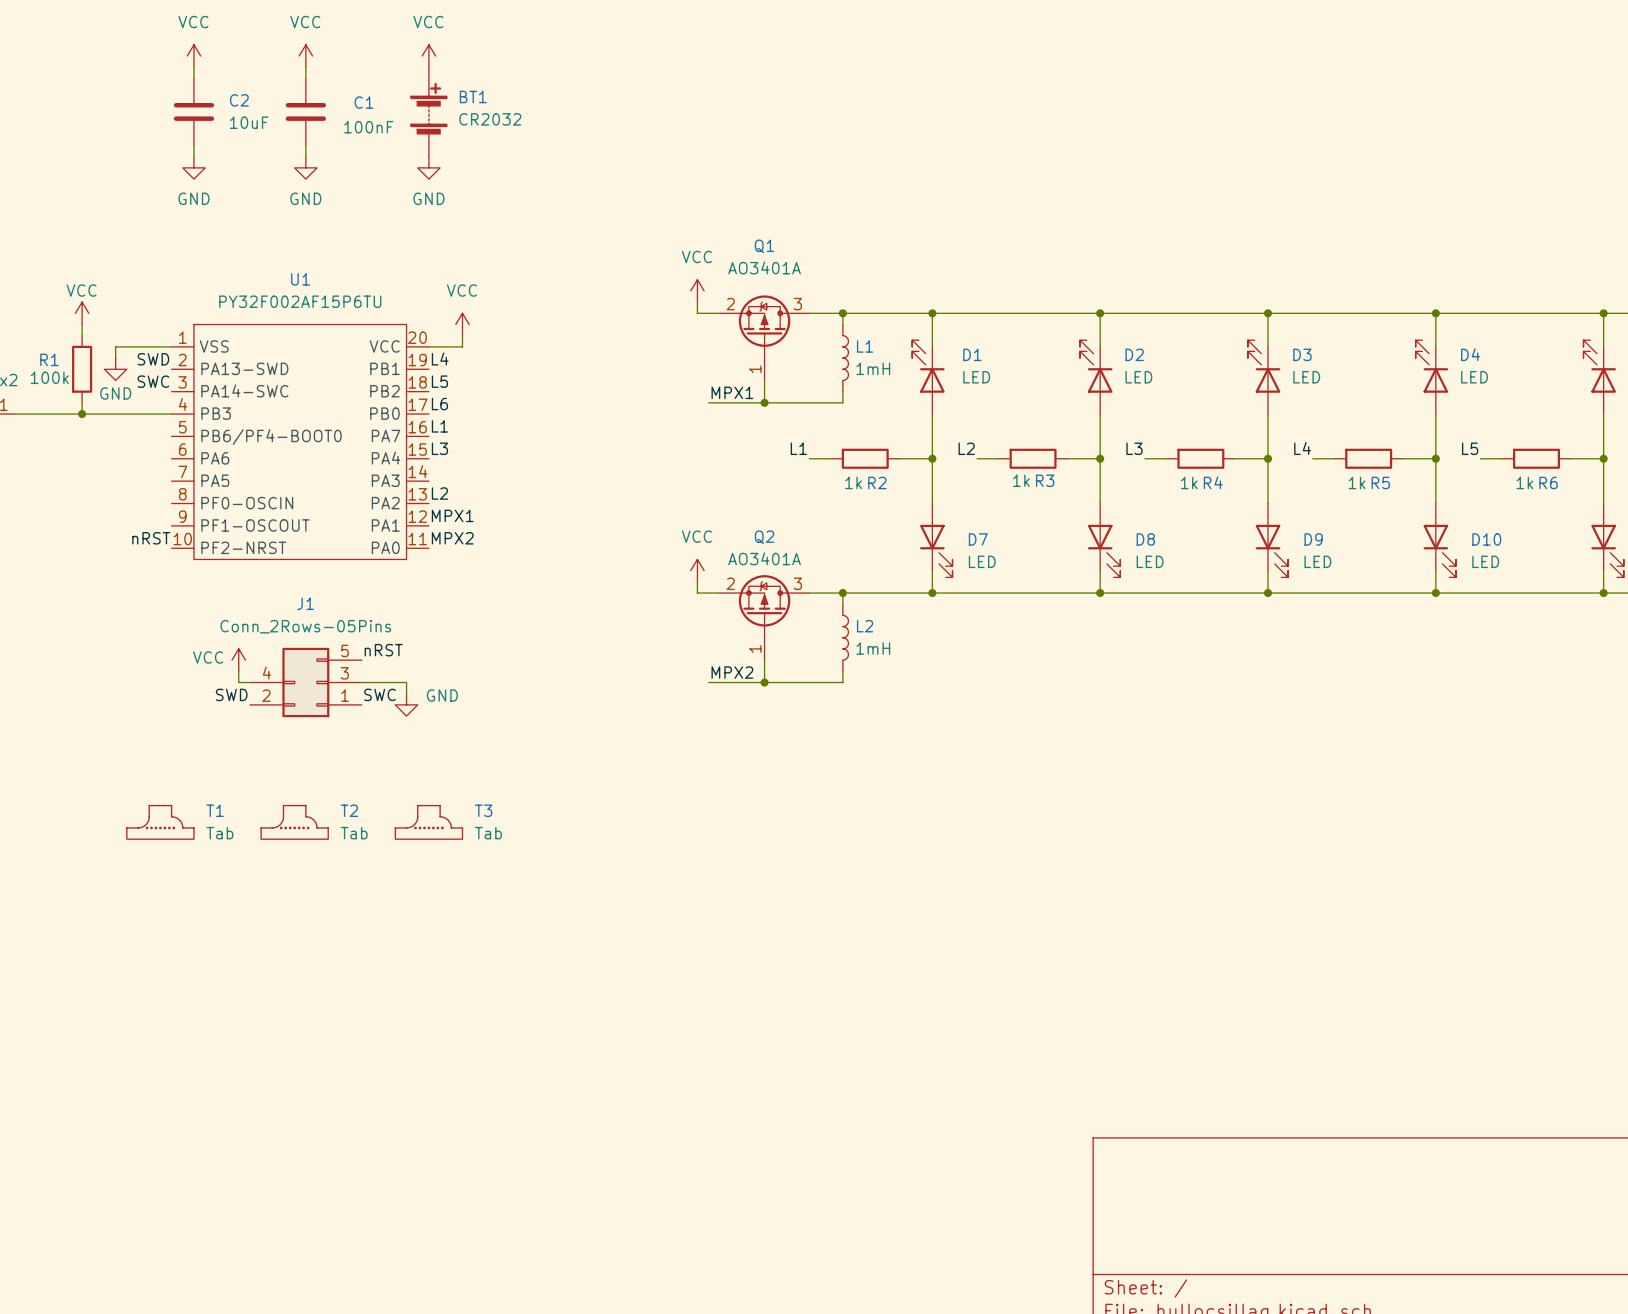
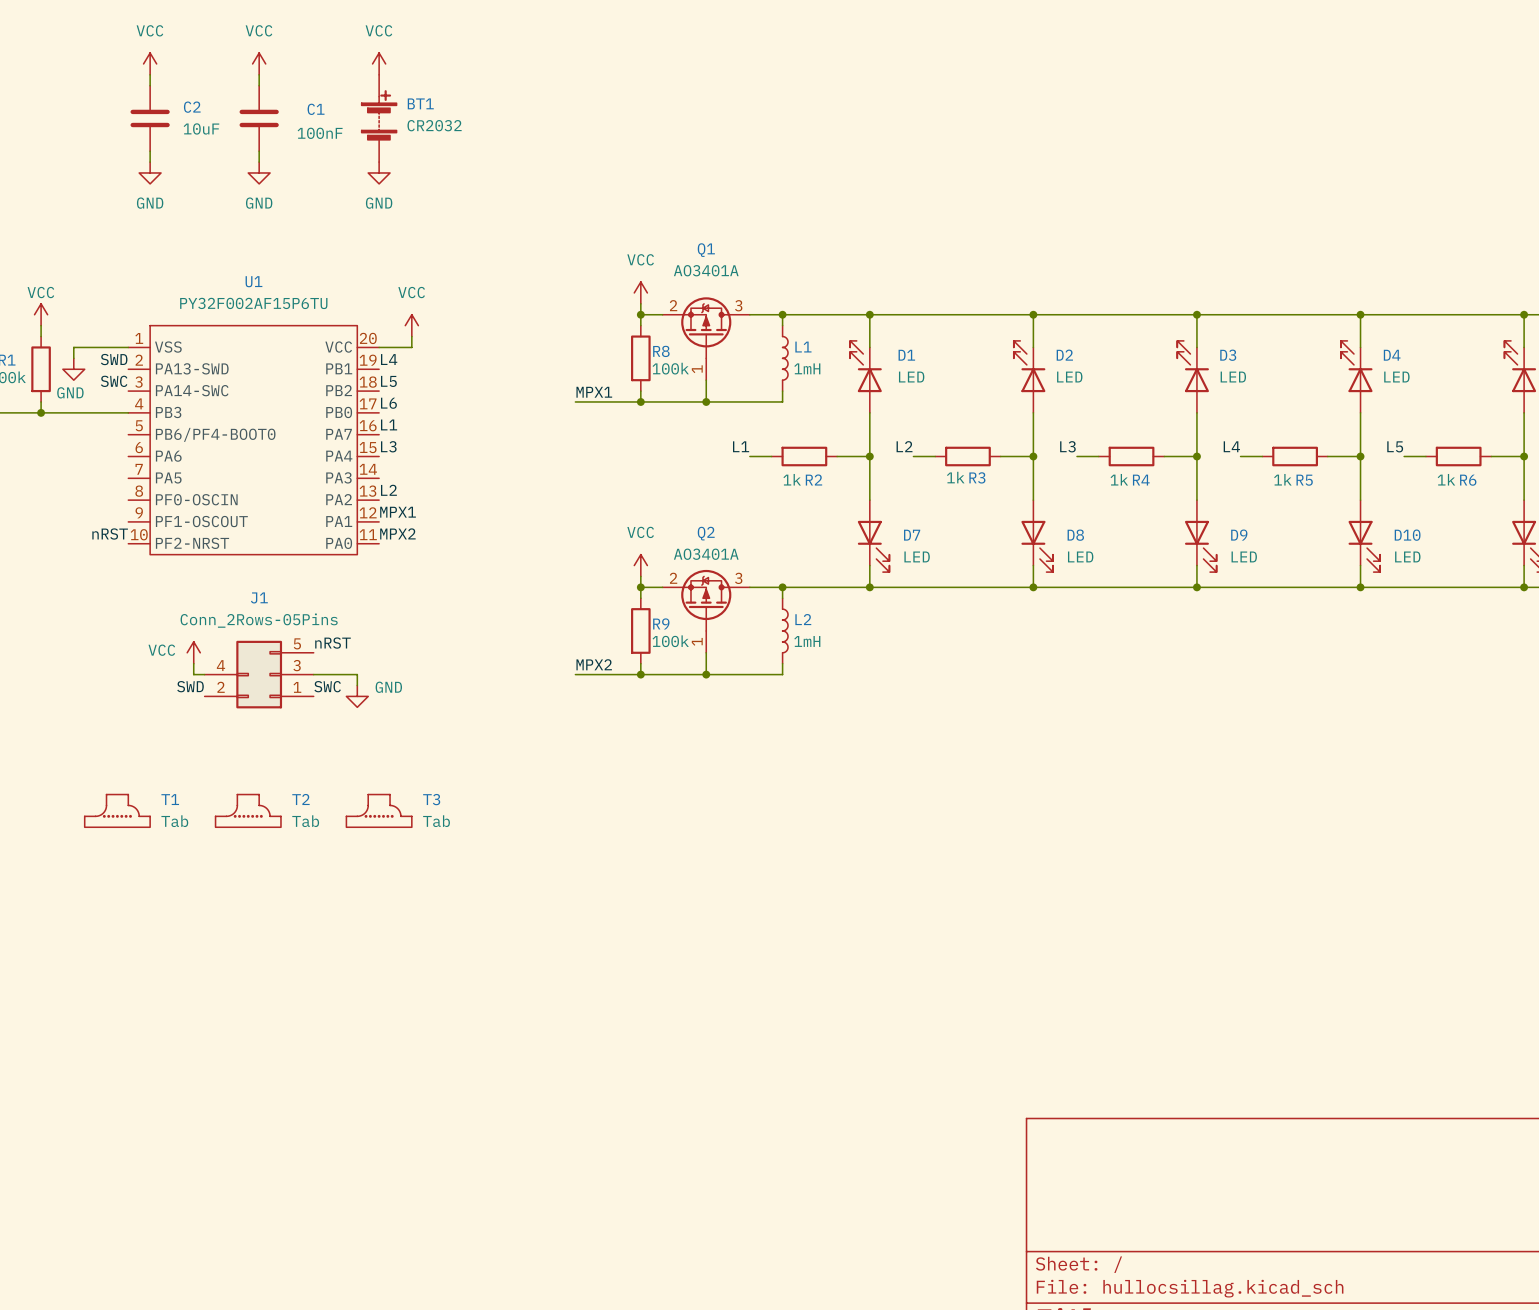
wire: none -> (640, 314) (640, 325)
junction: none -> (640, 314)
R8: none -> 100k (640, 358)
wire: none -> (640, 391) (640, 401)
label position: MPX1 (732, 392) -> MPX1 (594, 392)
wire: none -> (575, 401) (651, 401)
junction: none -> (640, 401)
wire: none -> (640, 587) (640, 598)
junction: none -> (640, 587)
R9: none -> 100k (640, 630)
wire: none -> (640, 663) (640, 674)
label position: MPX2 (732, 672) -> MPX2 (594, 664)
wire: none -> (575, 674) (651, 674)
junction: none -> (640, 674)

